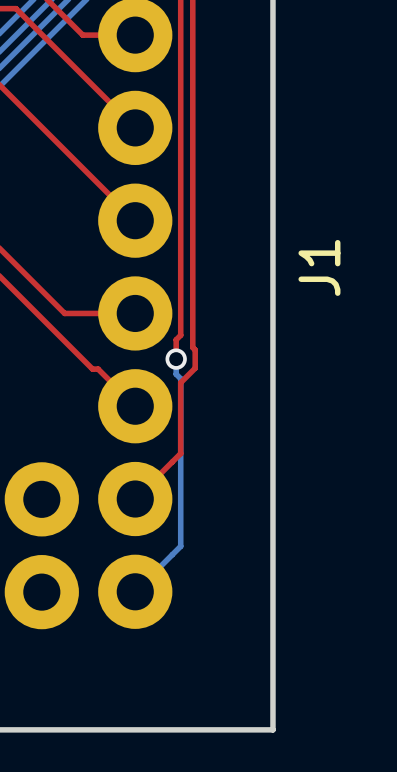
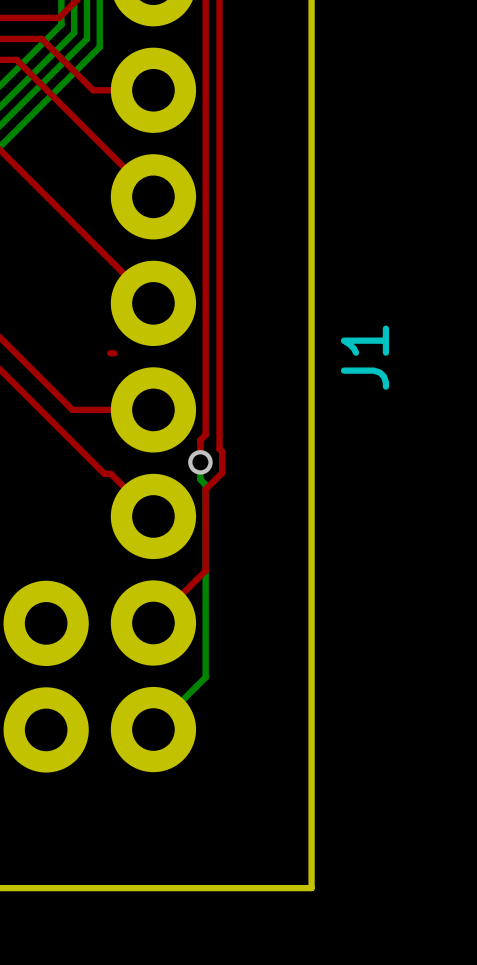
top track: none -> (110, 353) (114, 353)

